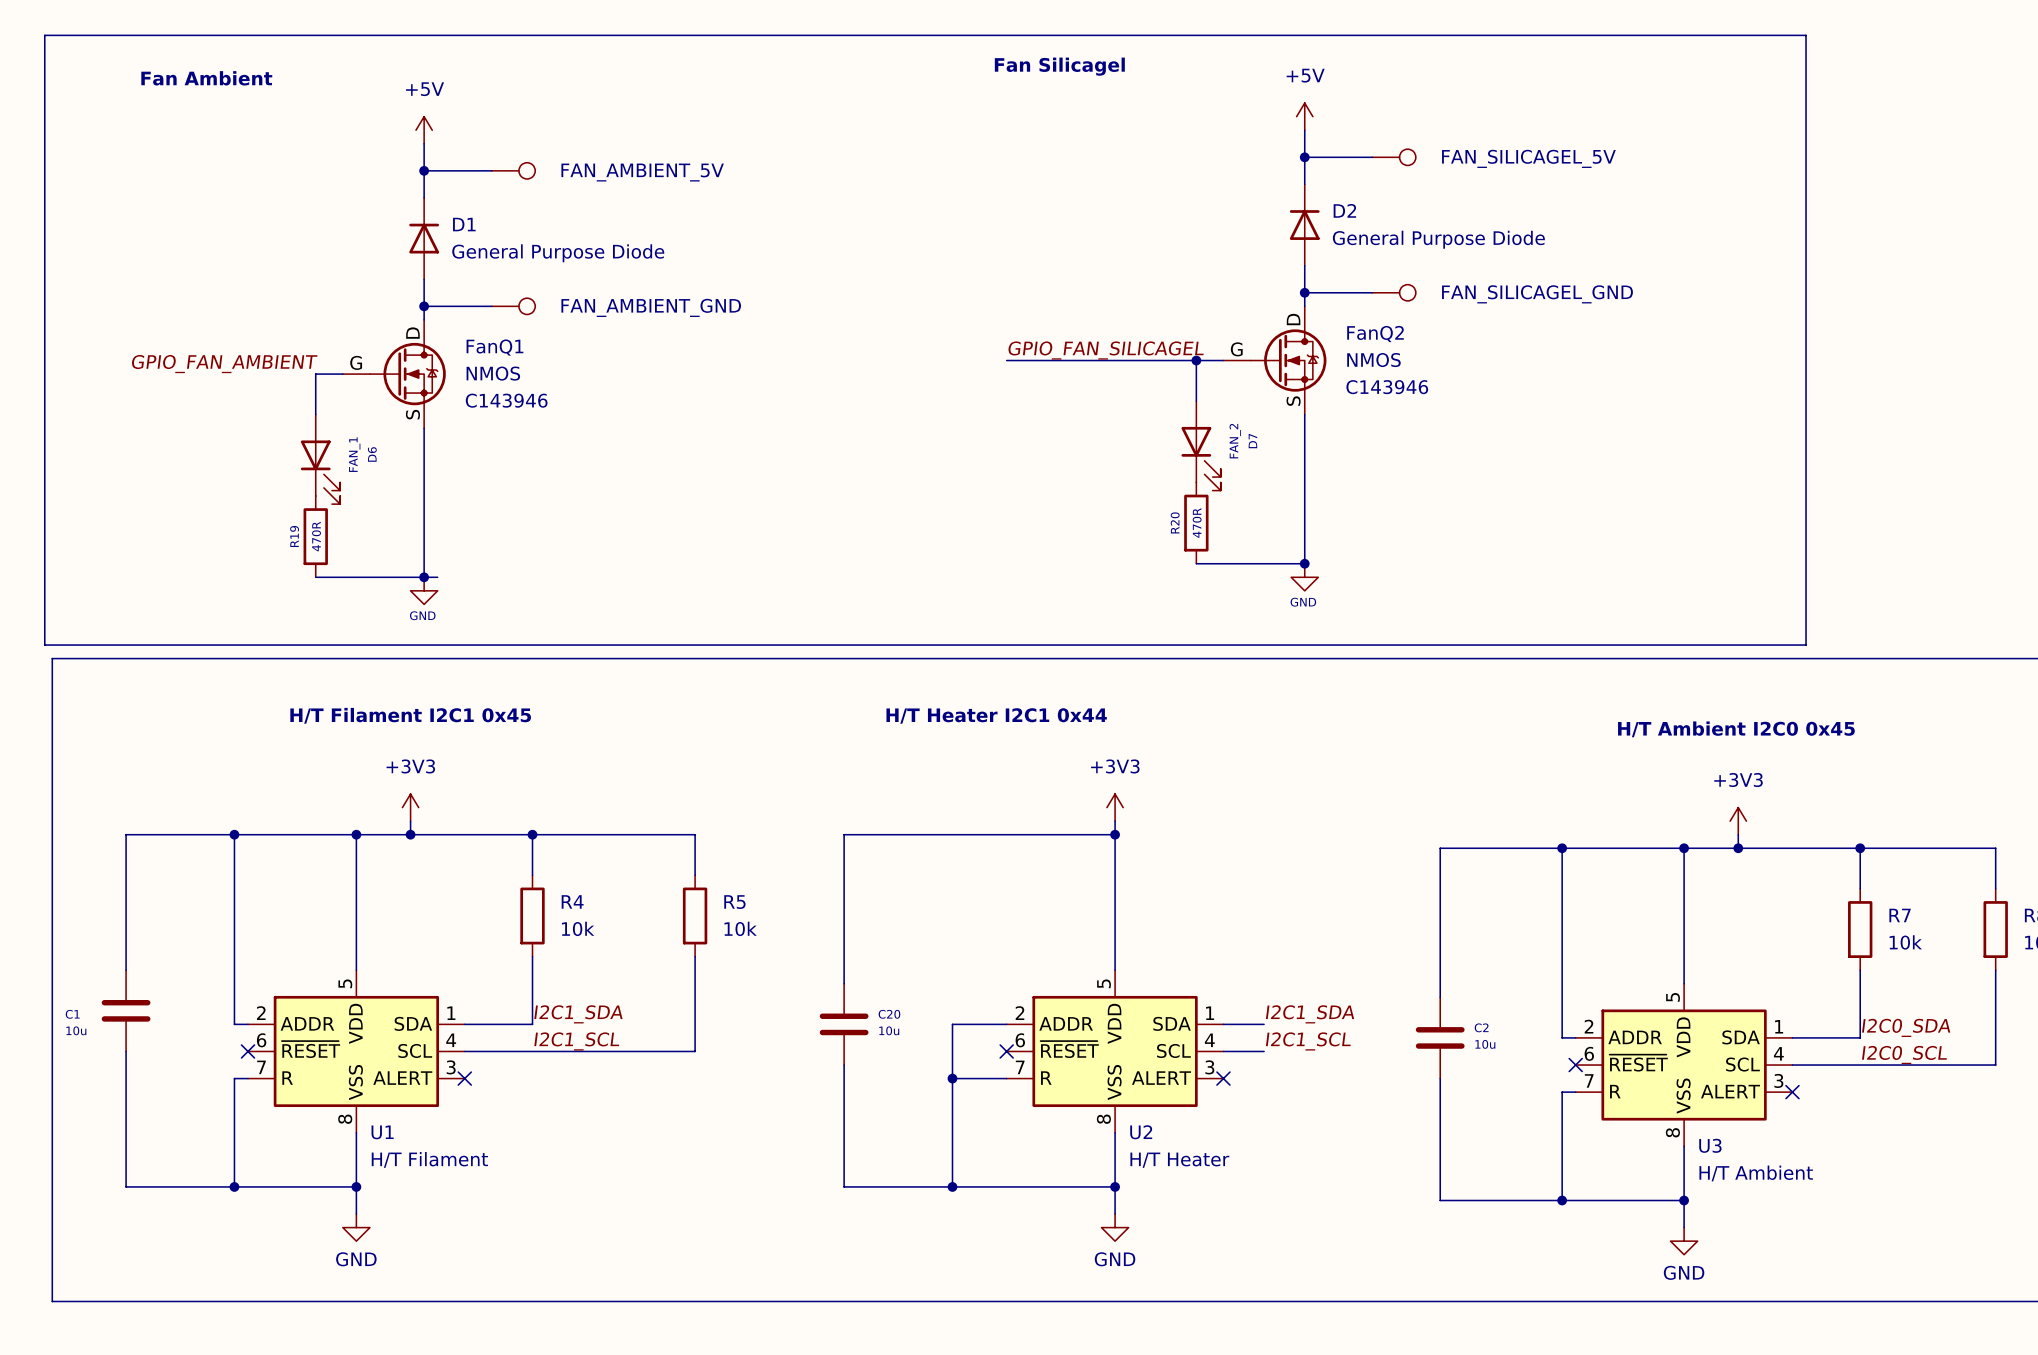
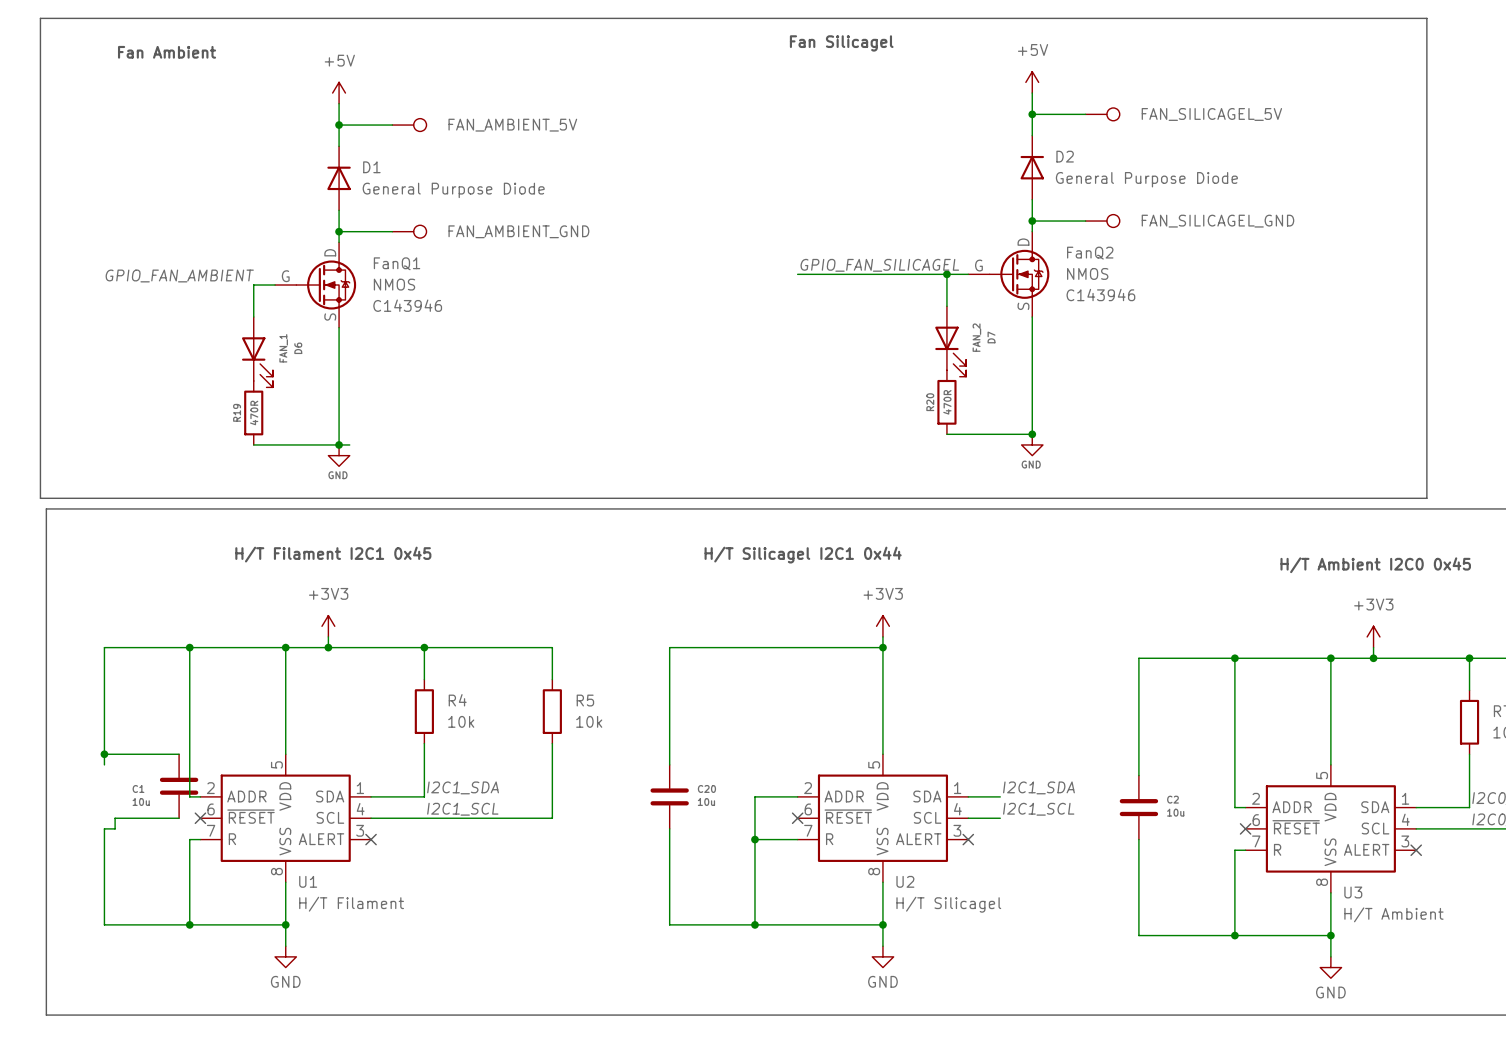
text: H/T Heater I2C1 0x44 (996, 715) -> H/T Silicagel I2C1 0x44 (803, 555)
junction: none -> (104, 754)
wire: none -> (179, 754) (104, 754) (104, 764)
C1 position: (126, 1010) -> (179, 786)
wire: (126, 1051) (126, 1065) -> (179, 818) (115, 818) (115, 828) (104, 828)
U2 value: H/T Heater (1179, 1160) -> H/T Silicagel (948, 904)

